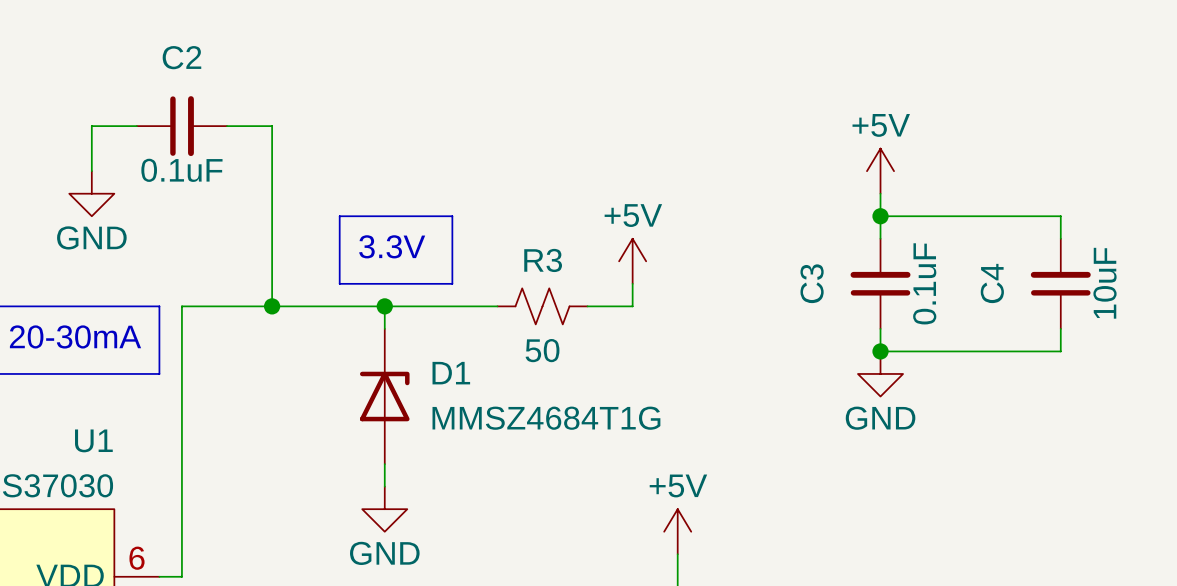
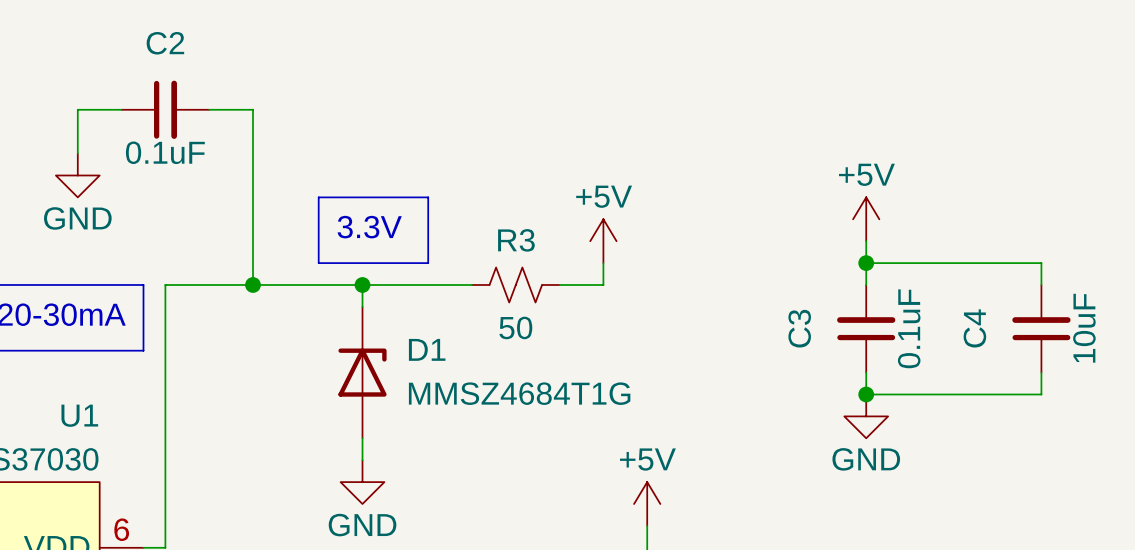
power symbol position: +5V (880, 171) -> +5V (866, 219)
wire: (880, 193) (880, 238) -> (866, 241) (866, 284)
wire: (880, 216) (1060, 216) (1060, 238) -> (866, 263) (1041, 263) (1041, 284)
junction: (880, 216) -> none
C3 position: (880, 283) -> (866, 328)
junction: none -> (866, 263)
C4 position: (1060, 283) -> (1041, 328)
wire: (880, 328) (880, 351) (1060, 351) (1060, 328) -> (866, 372) (866, 394) (1041, 394) (1041, 372)
junction: (880, 351) -> none
power symbol position: GND (880, 373) -> GND (866, 416)
junction: none -> (866, 394)

